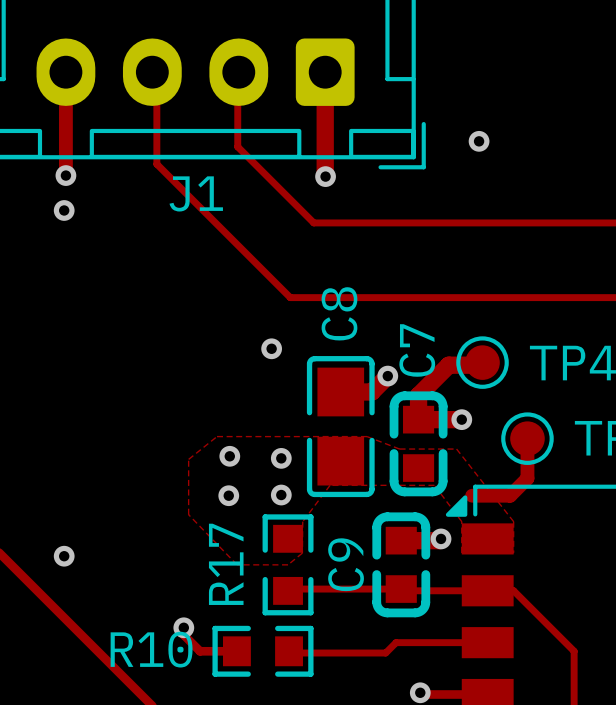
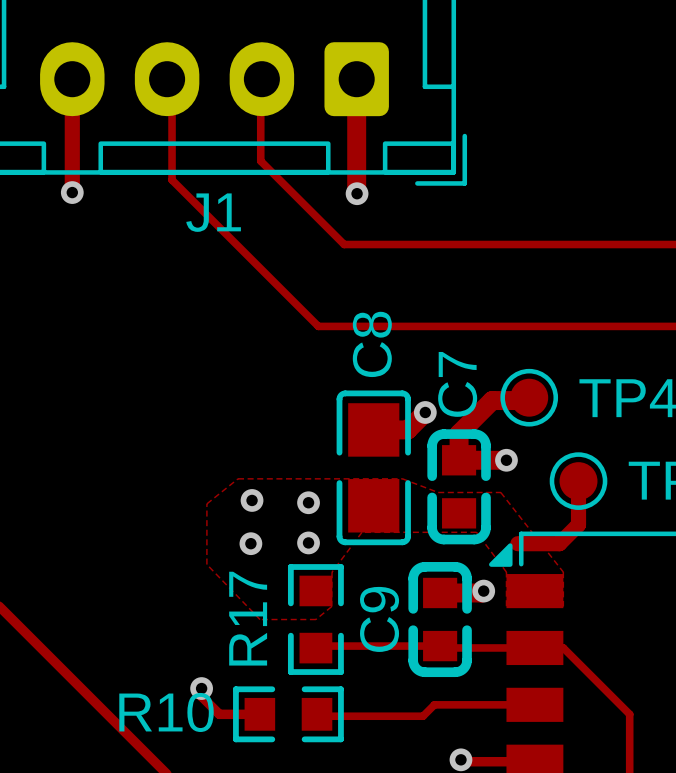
via: (479, 141) -> none
via: (64, 210) -> none
via: (271, 348) -> none
via: (64, 556) -> none

